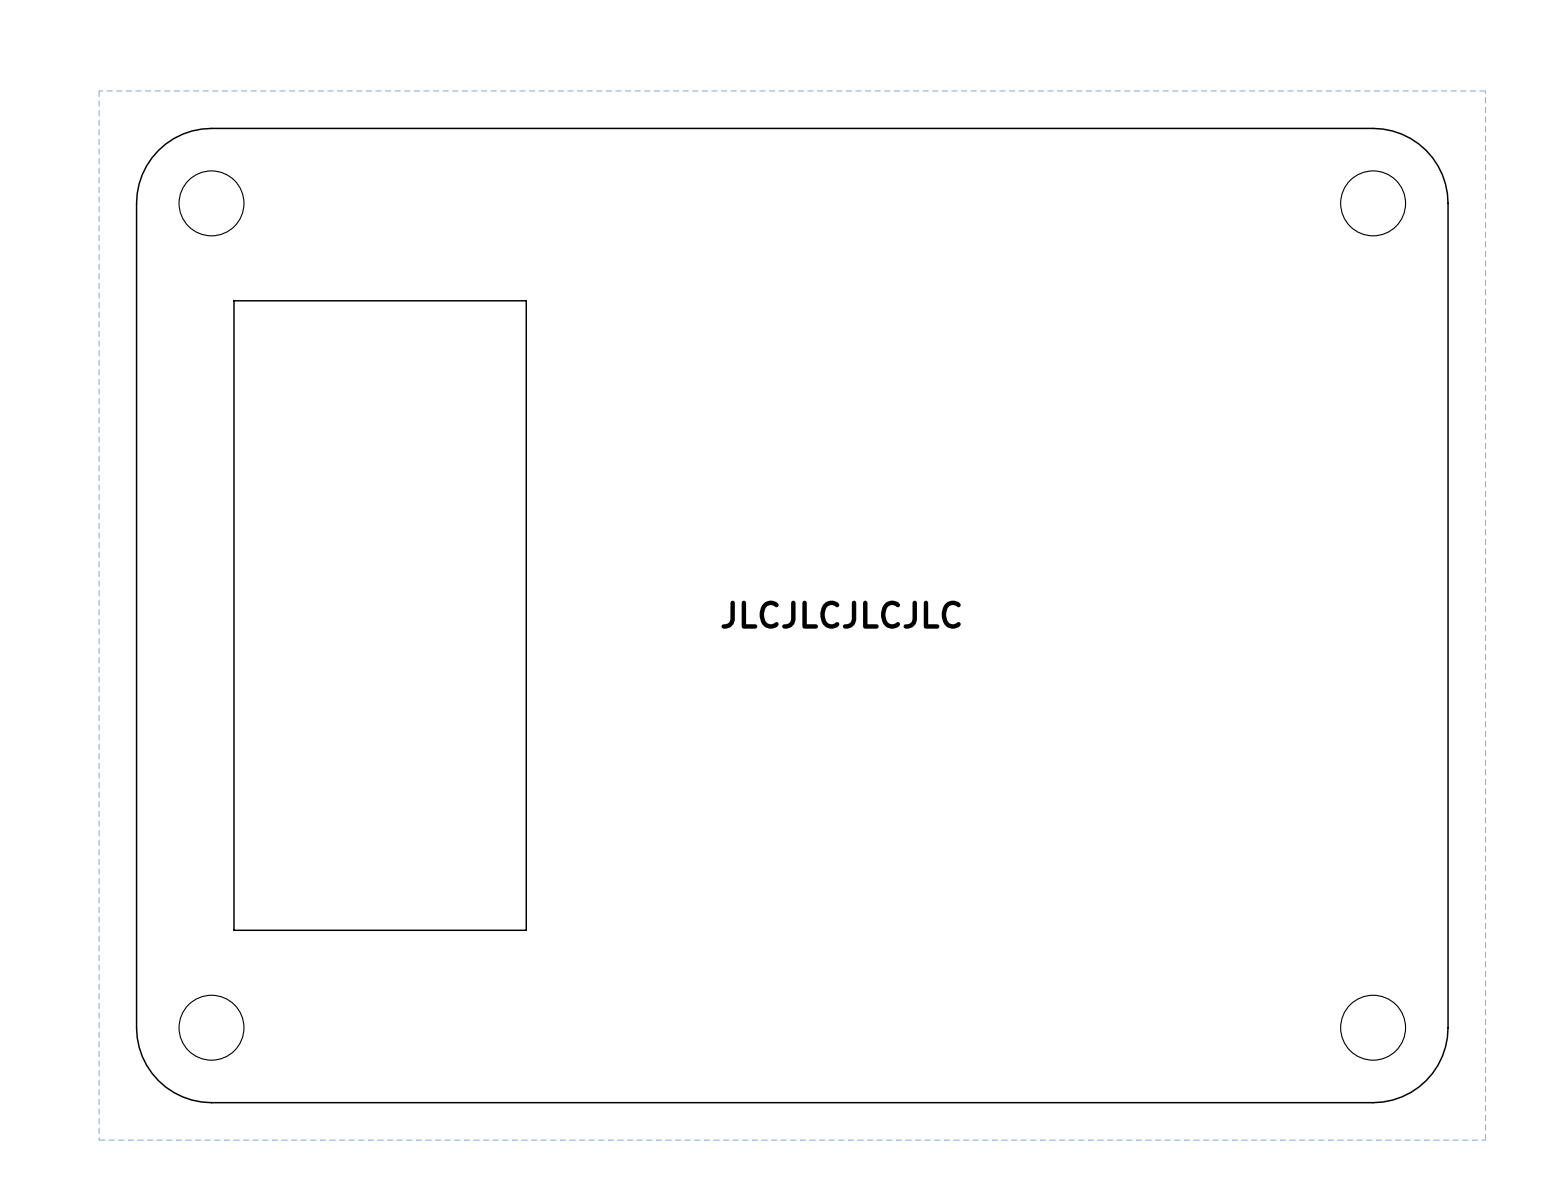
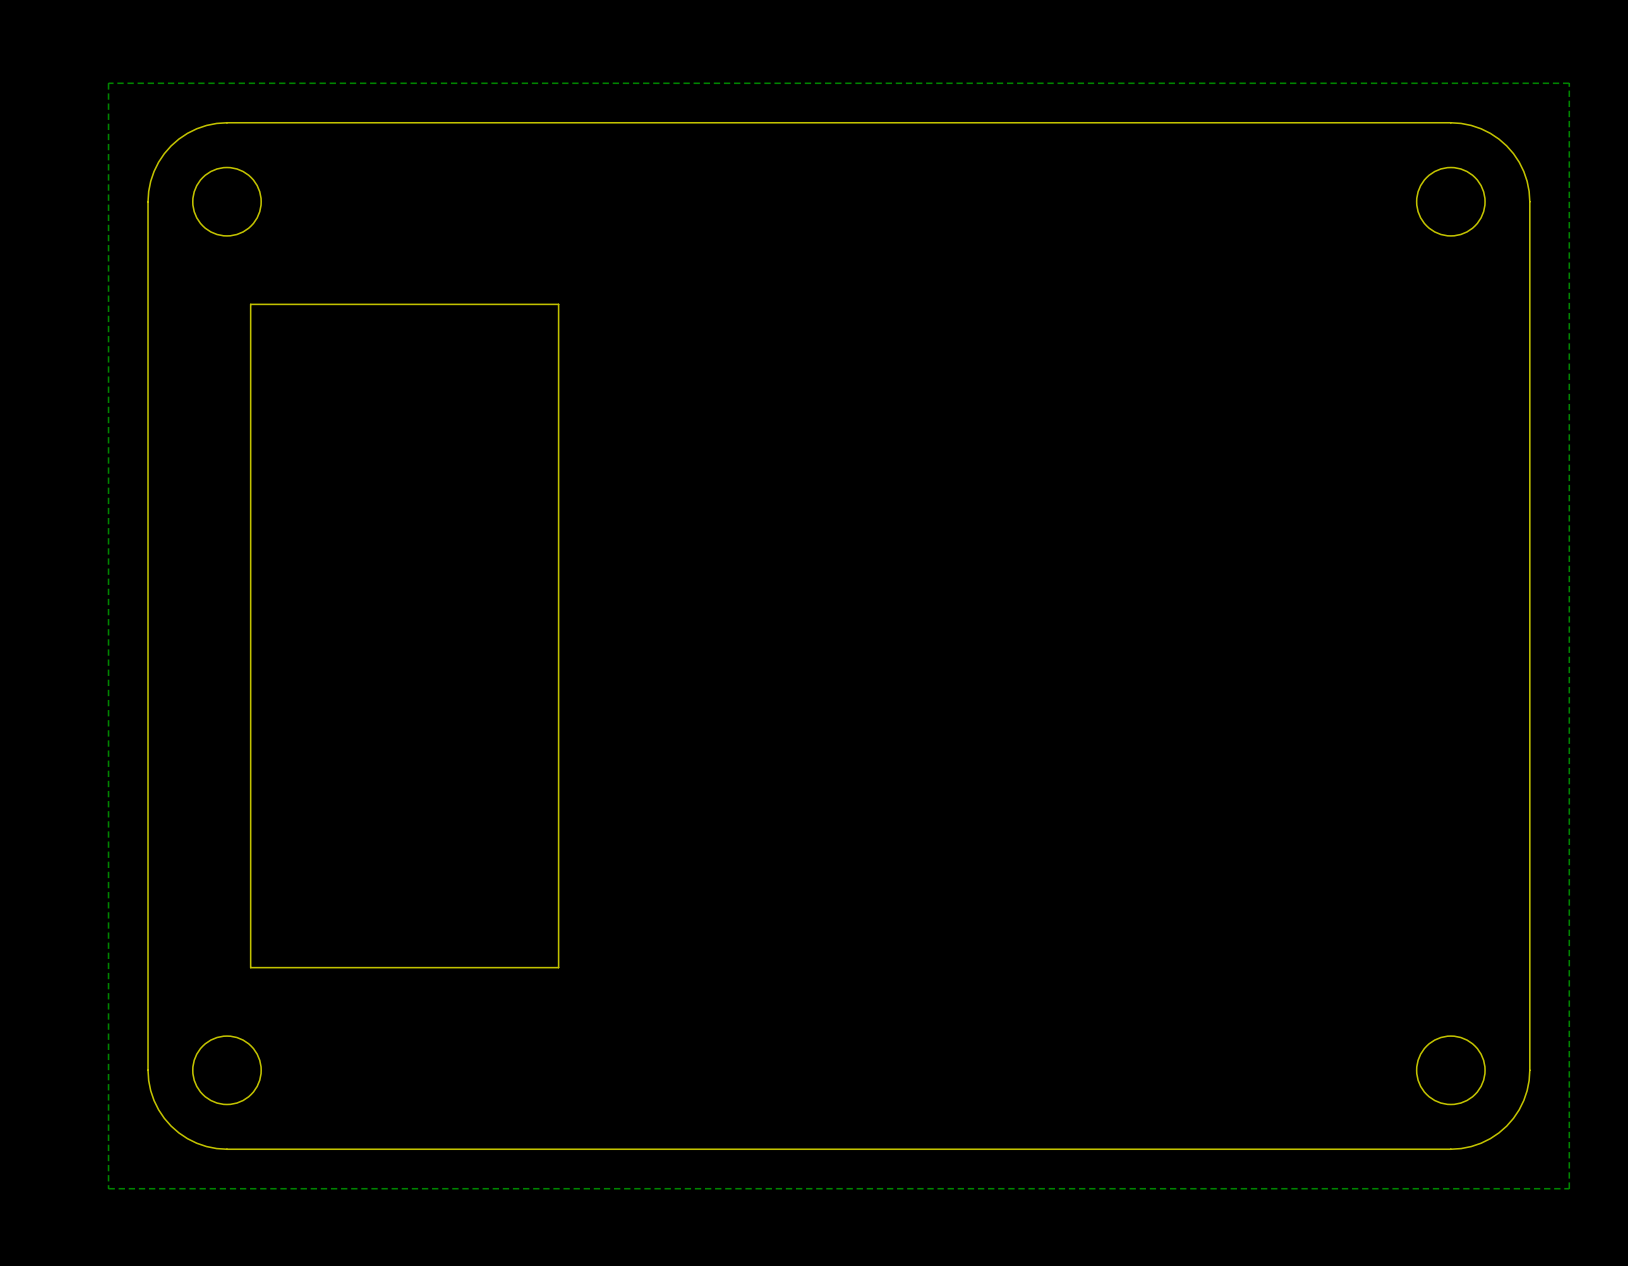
text: JLCJLCJLCJLC (841, 614) -> none

